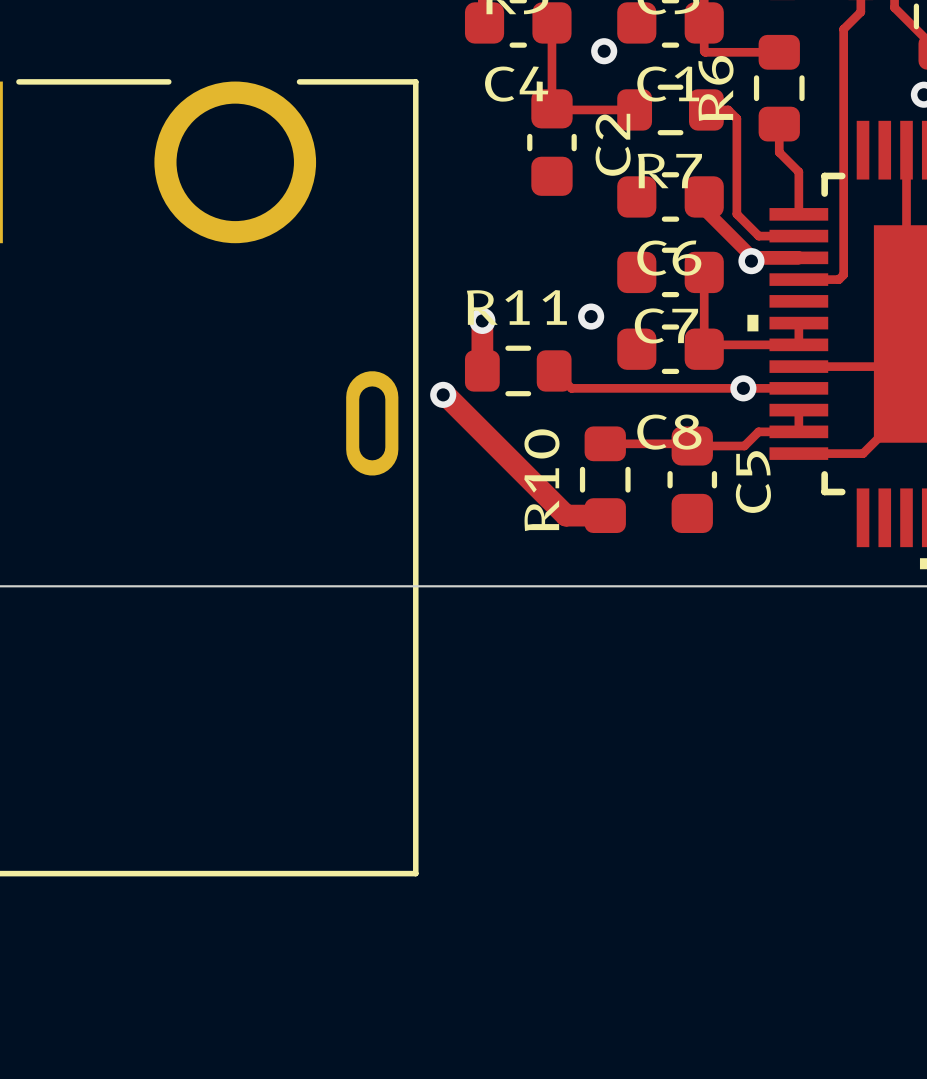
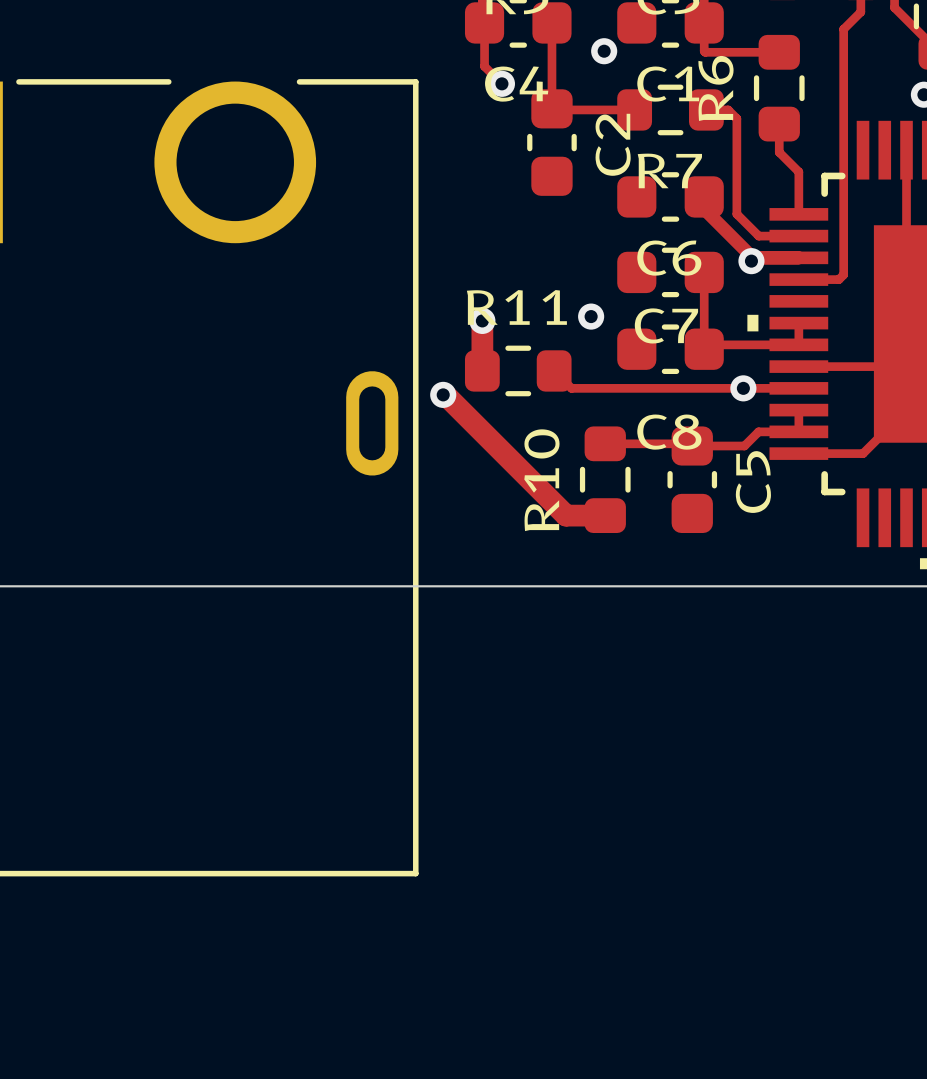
track: none -> (484, 22) (484, 66) (501, 83)
via: none -> (501, 83)

